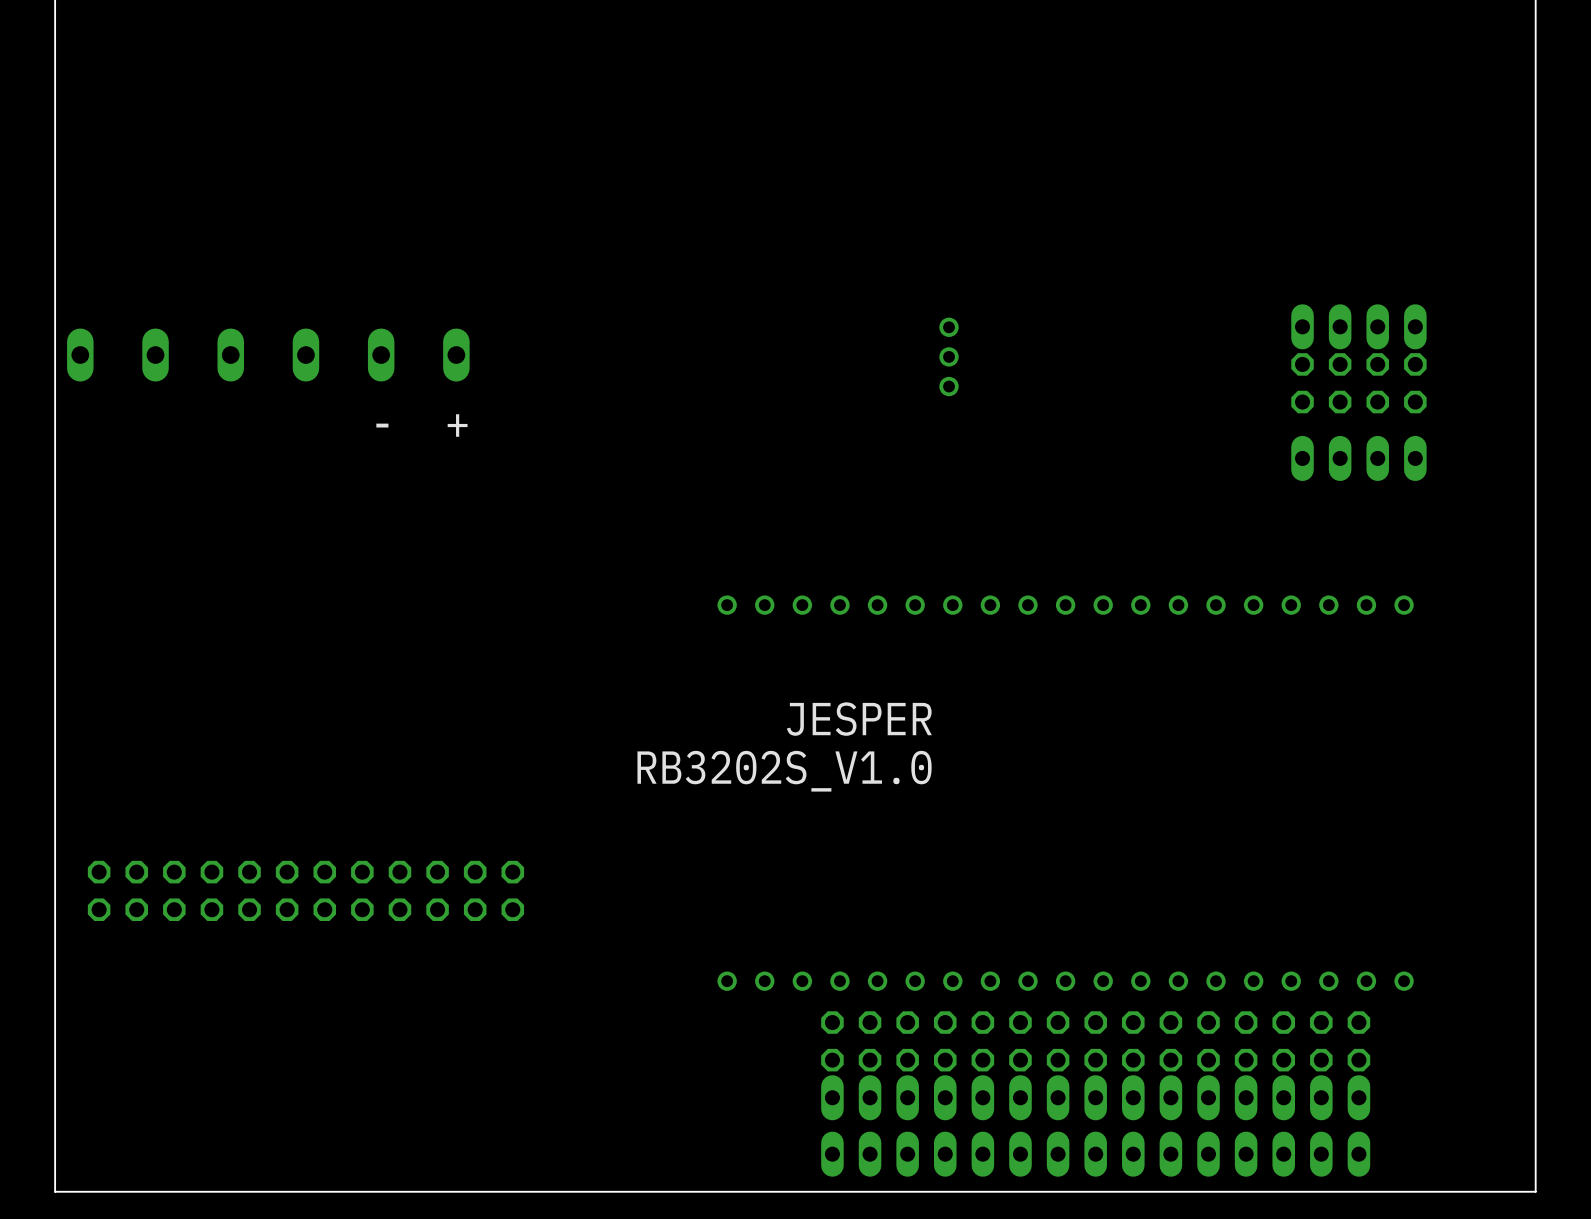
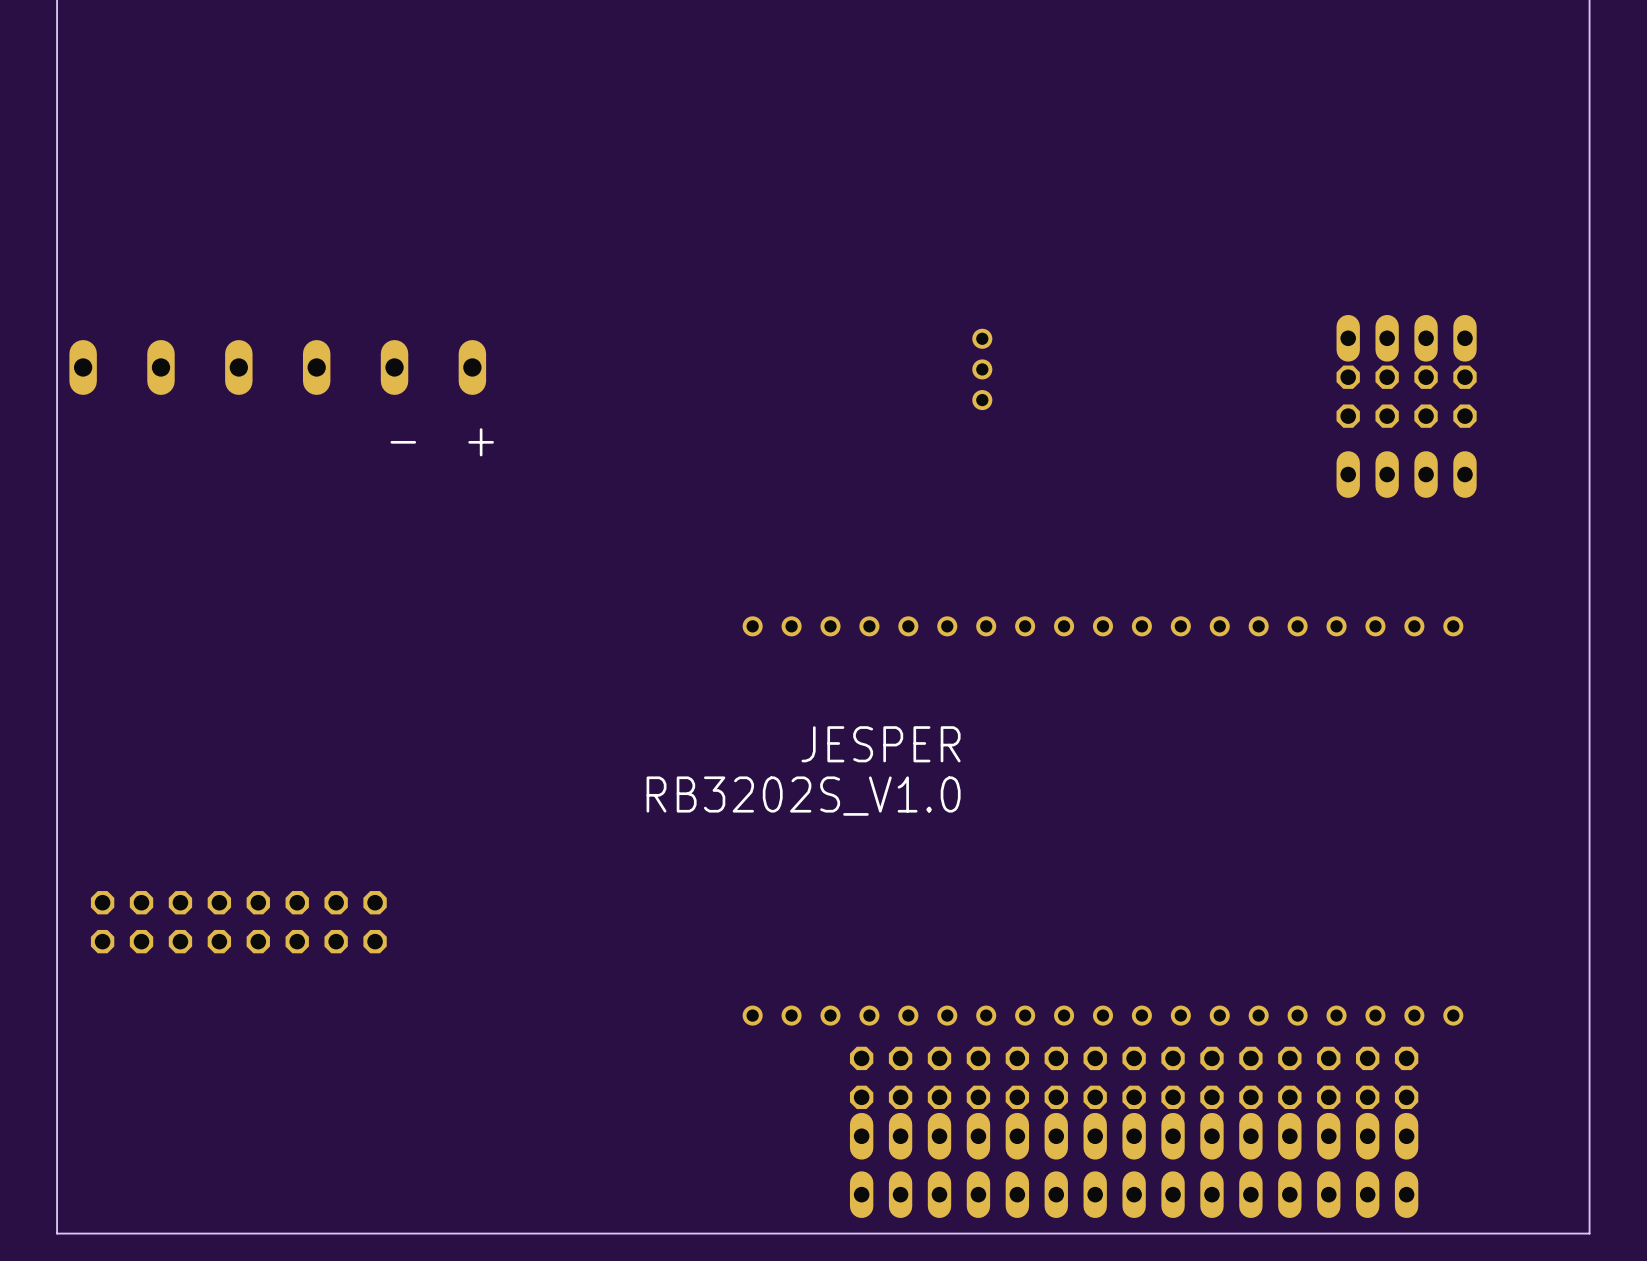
part: (456, 890) -> none

